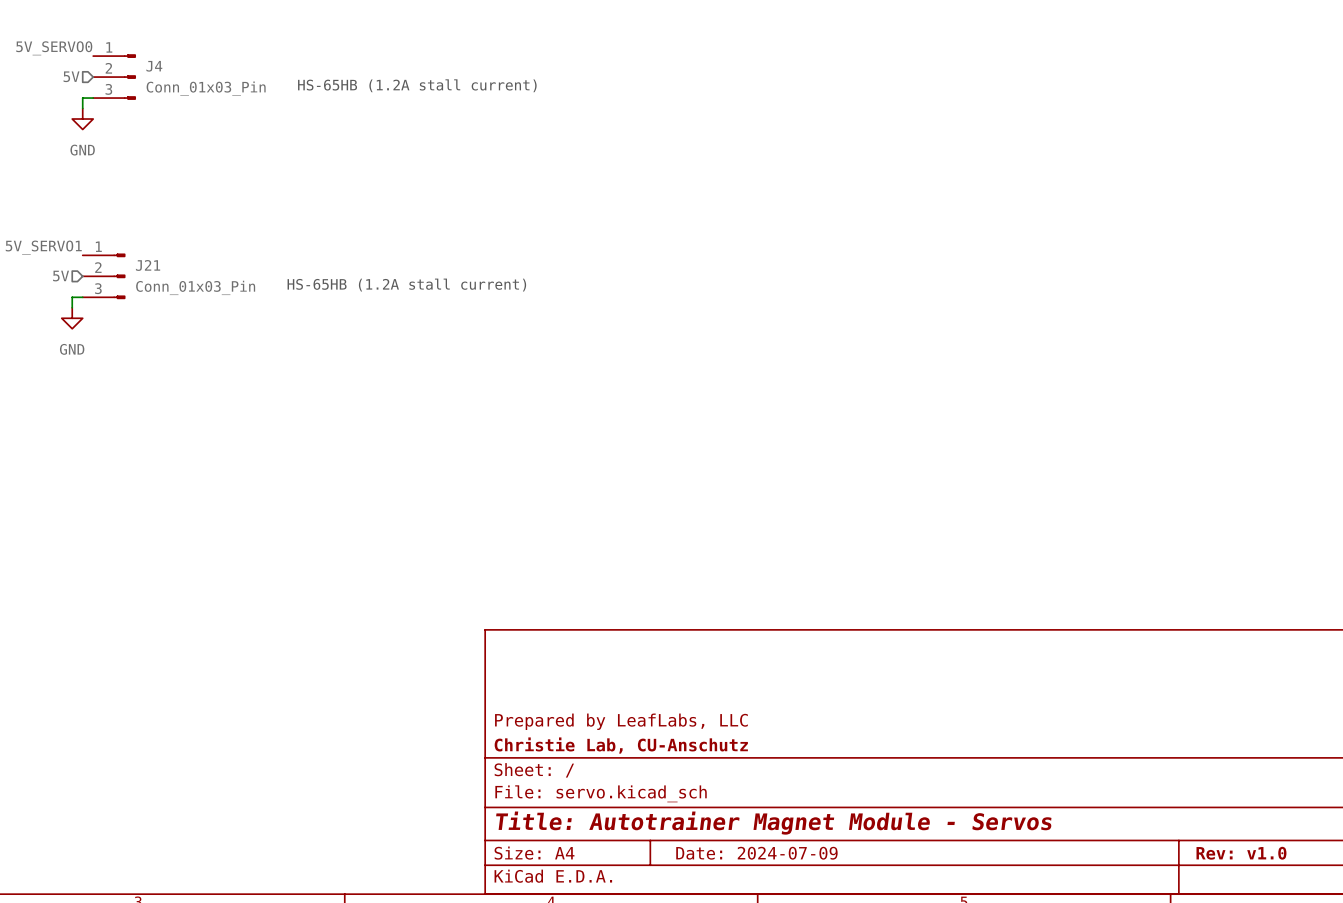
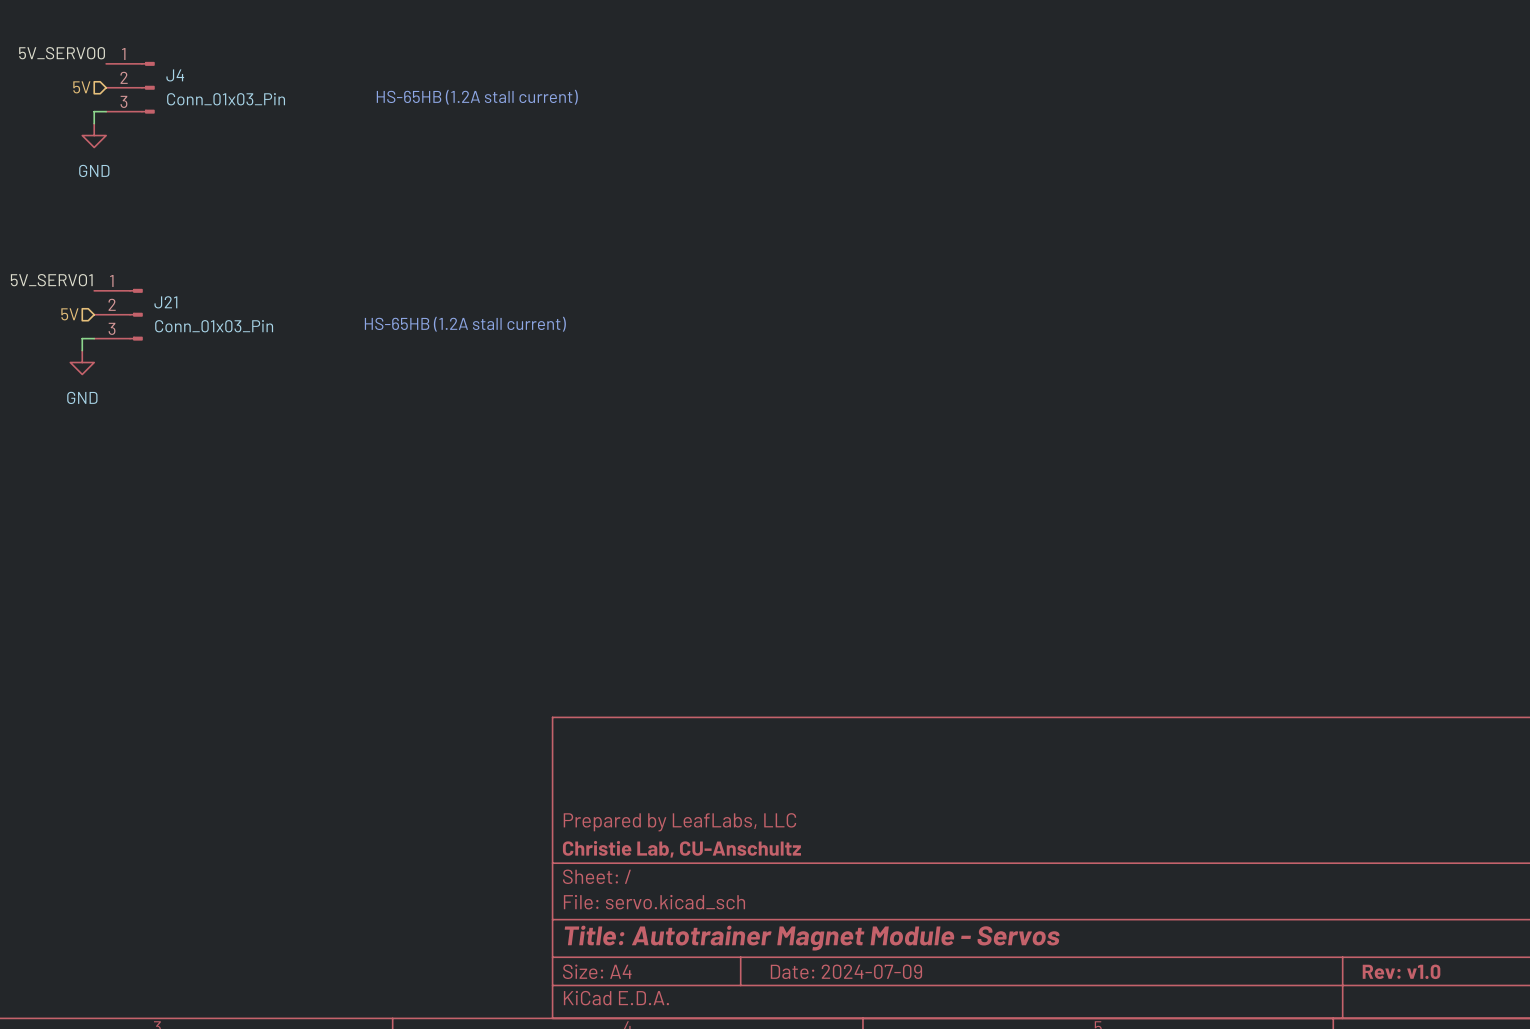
title block: Christie Lab, CU-Anschutz (621, 745) -> Christie Lab, CU-Anschultz (681, 849)

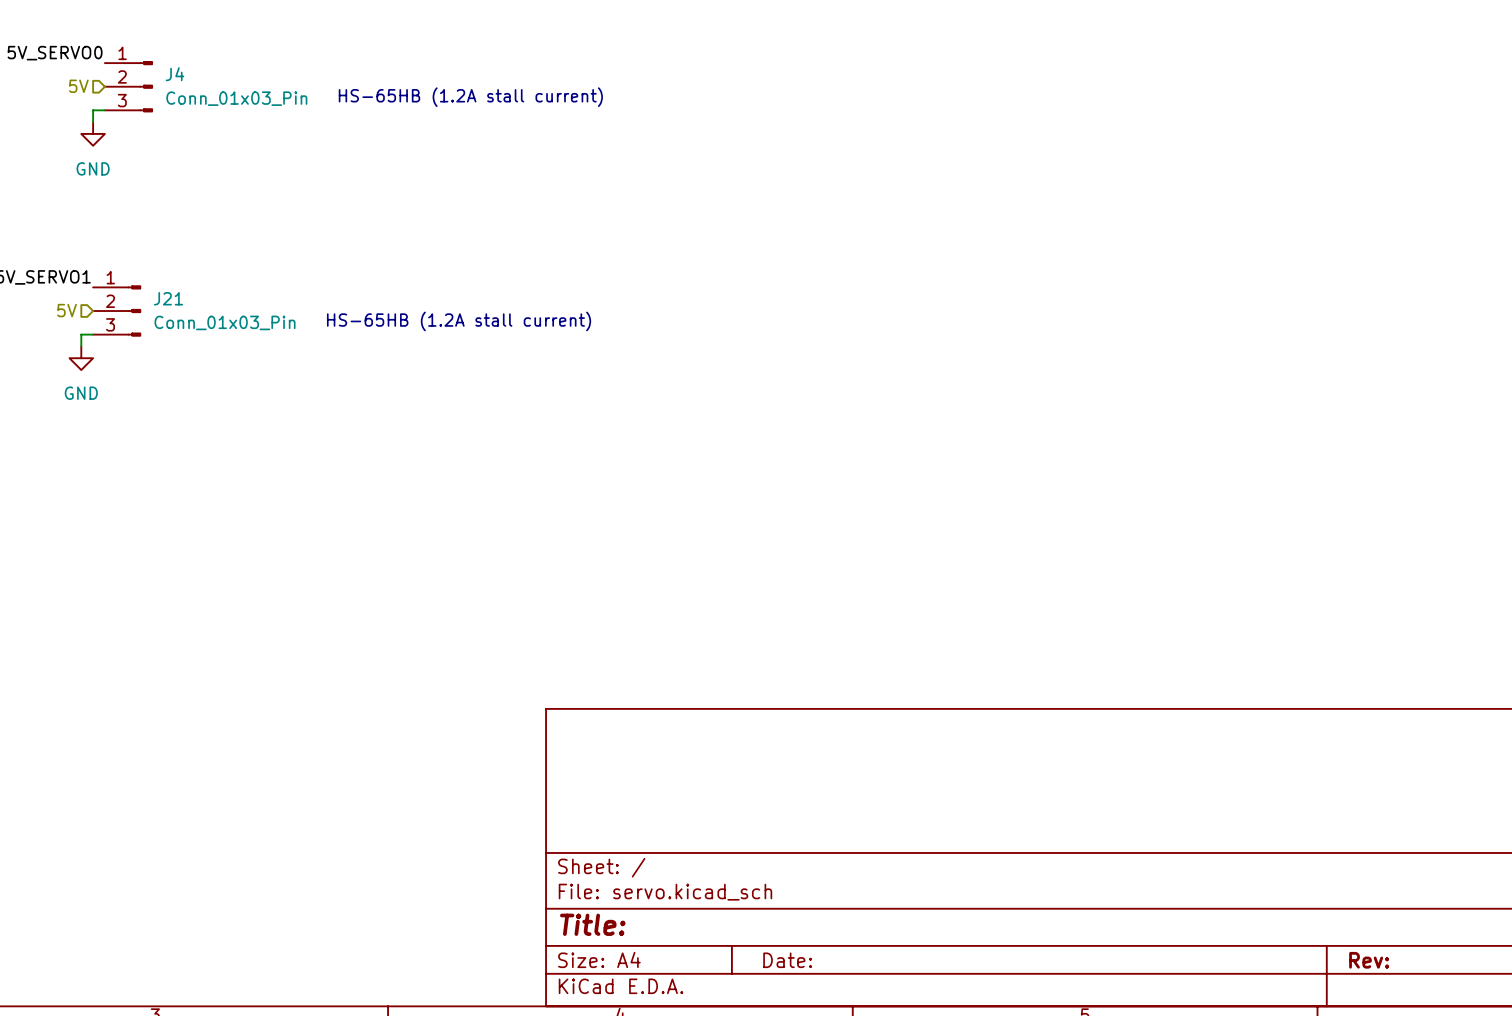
title block: Prepared by LeafLabs, LLC (679, 822) -> none
title block: Christie Lab, CU-Anschultz (681, 849) -> none
title block: Title: Autotrainer Magnet Module - Servos (812, 938) -> Title: (592, 924)
title block: Date: 2024-07-09 (846, 971) -> Date: (787, 960)
title block: Rev: v1.0 (1401, 971) -> Rev: (1369, 960)

